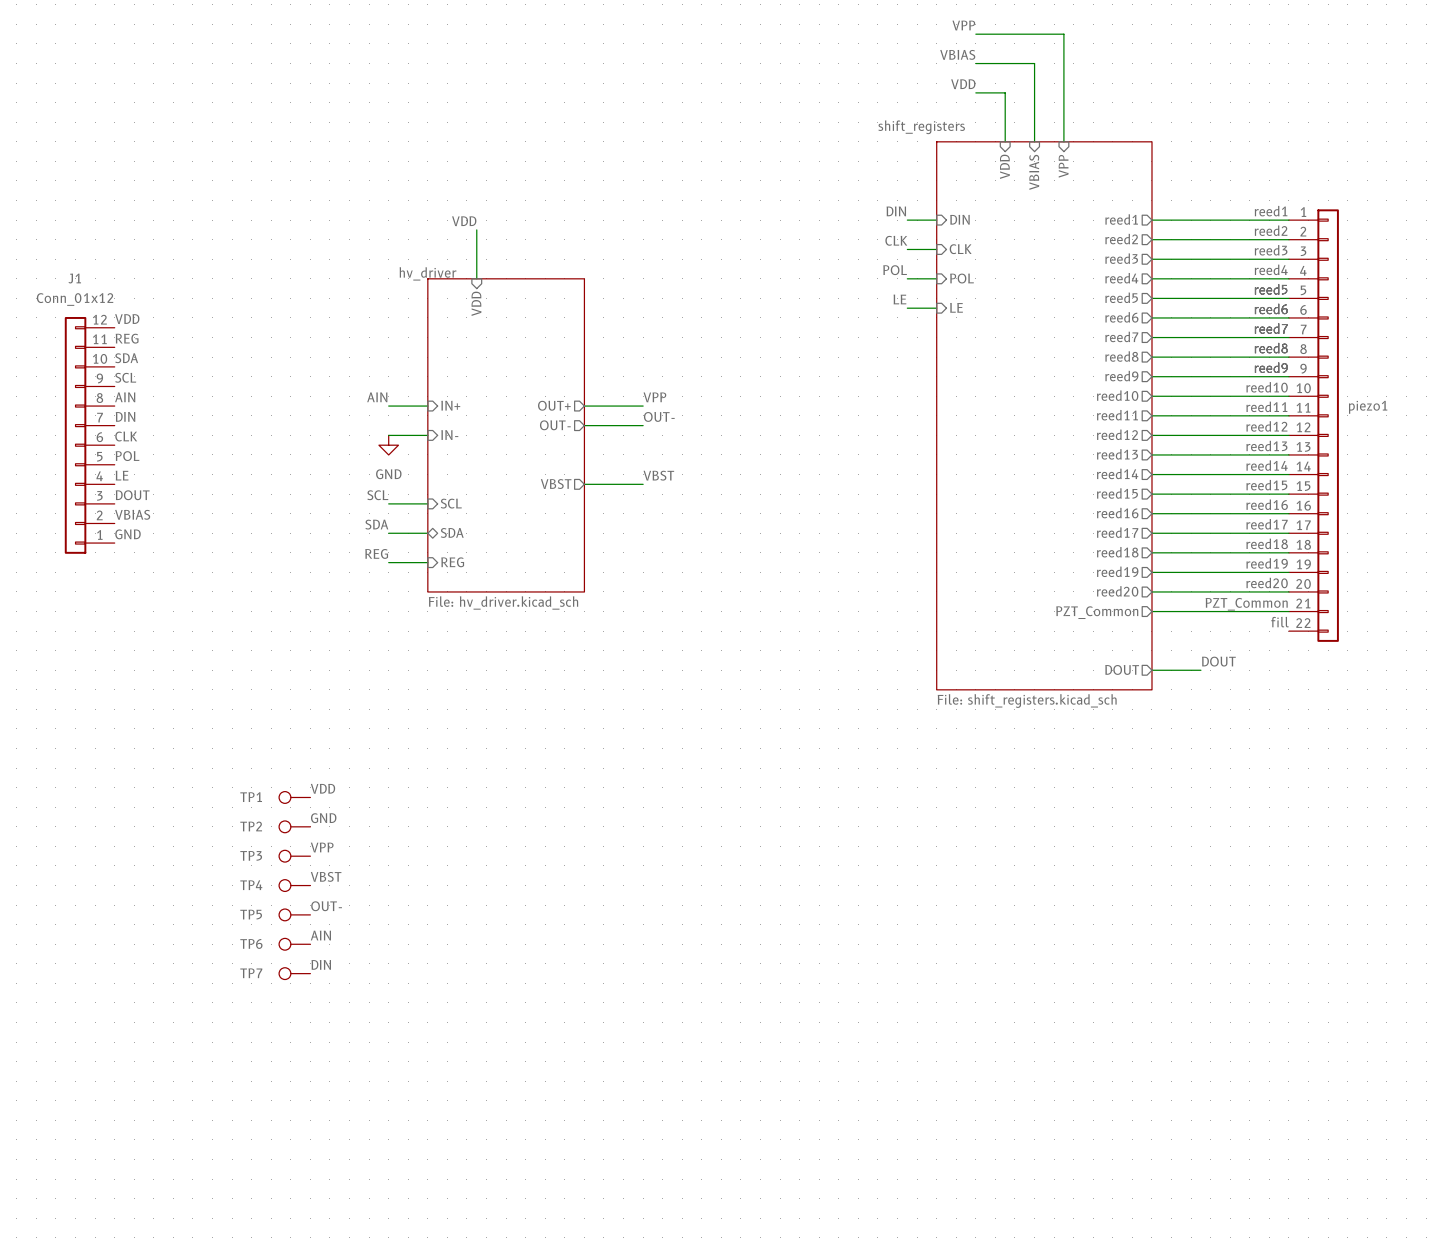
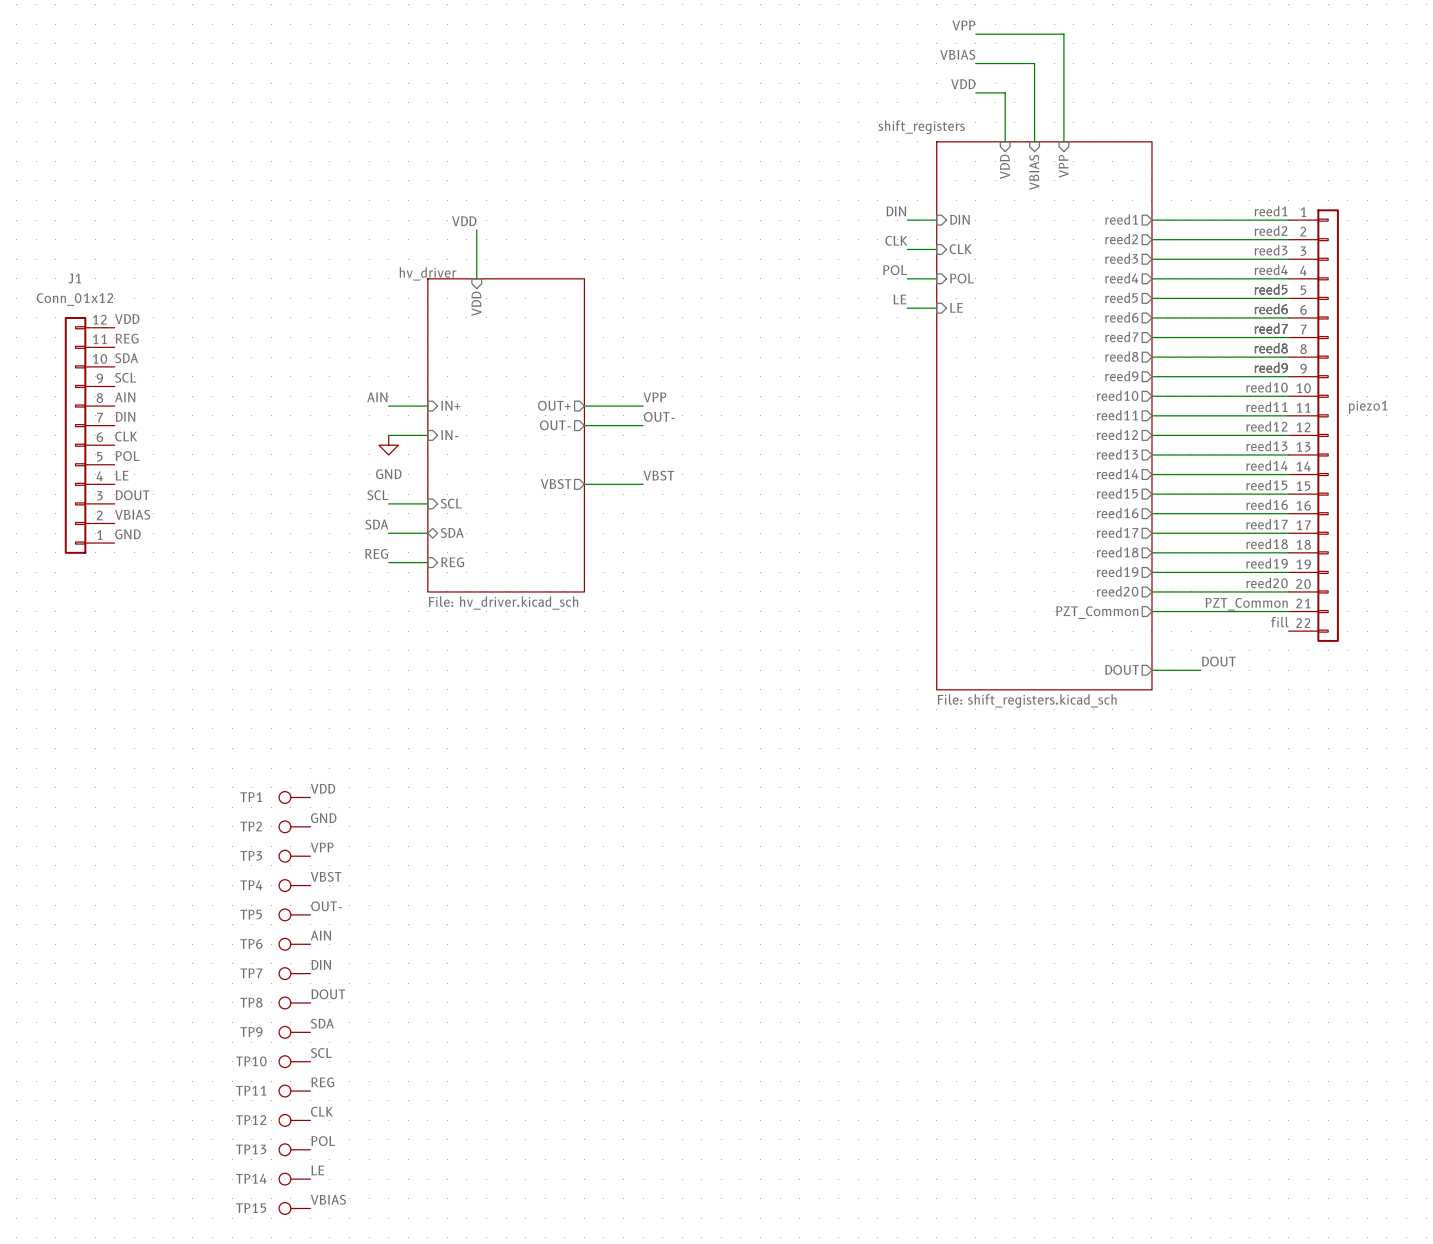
label: none -> DOUT (328, 994)
TP8: none -> (294, 1002)
label: none -> SDA (322, 1023)
TP9: none -> (294, 1032)
label: none -> SCL (321, 1053)
TP10: none -> (294, 1061)
label: none -> REG (322, 1082)
TP11: none -> (294, 1091)
label: none -> CLK (321, 1111)
TP12: none -> (294, 1120)
label: none -> POL (323, 1141)
TP13: none -> (294, 1149)
label: none -> LE (317, 1170)
TP14: none -> (294, 1179)
label: none -> VBIAS (328, 1199)
TP15: none -> (294, 1208)

